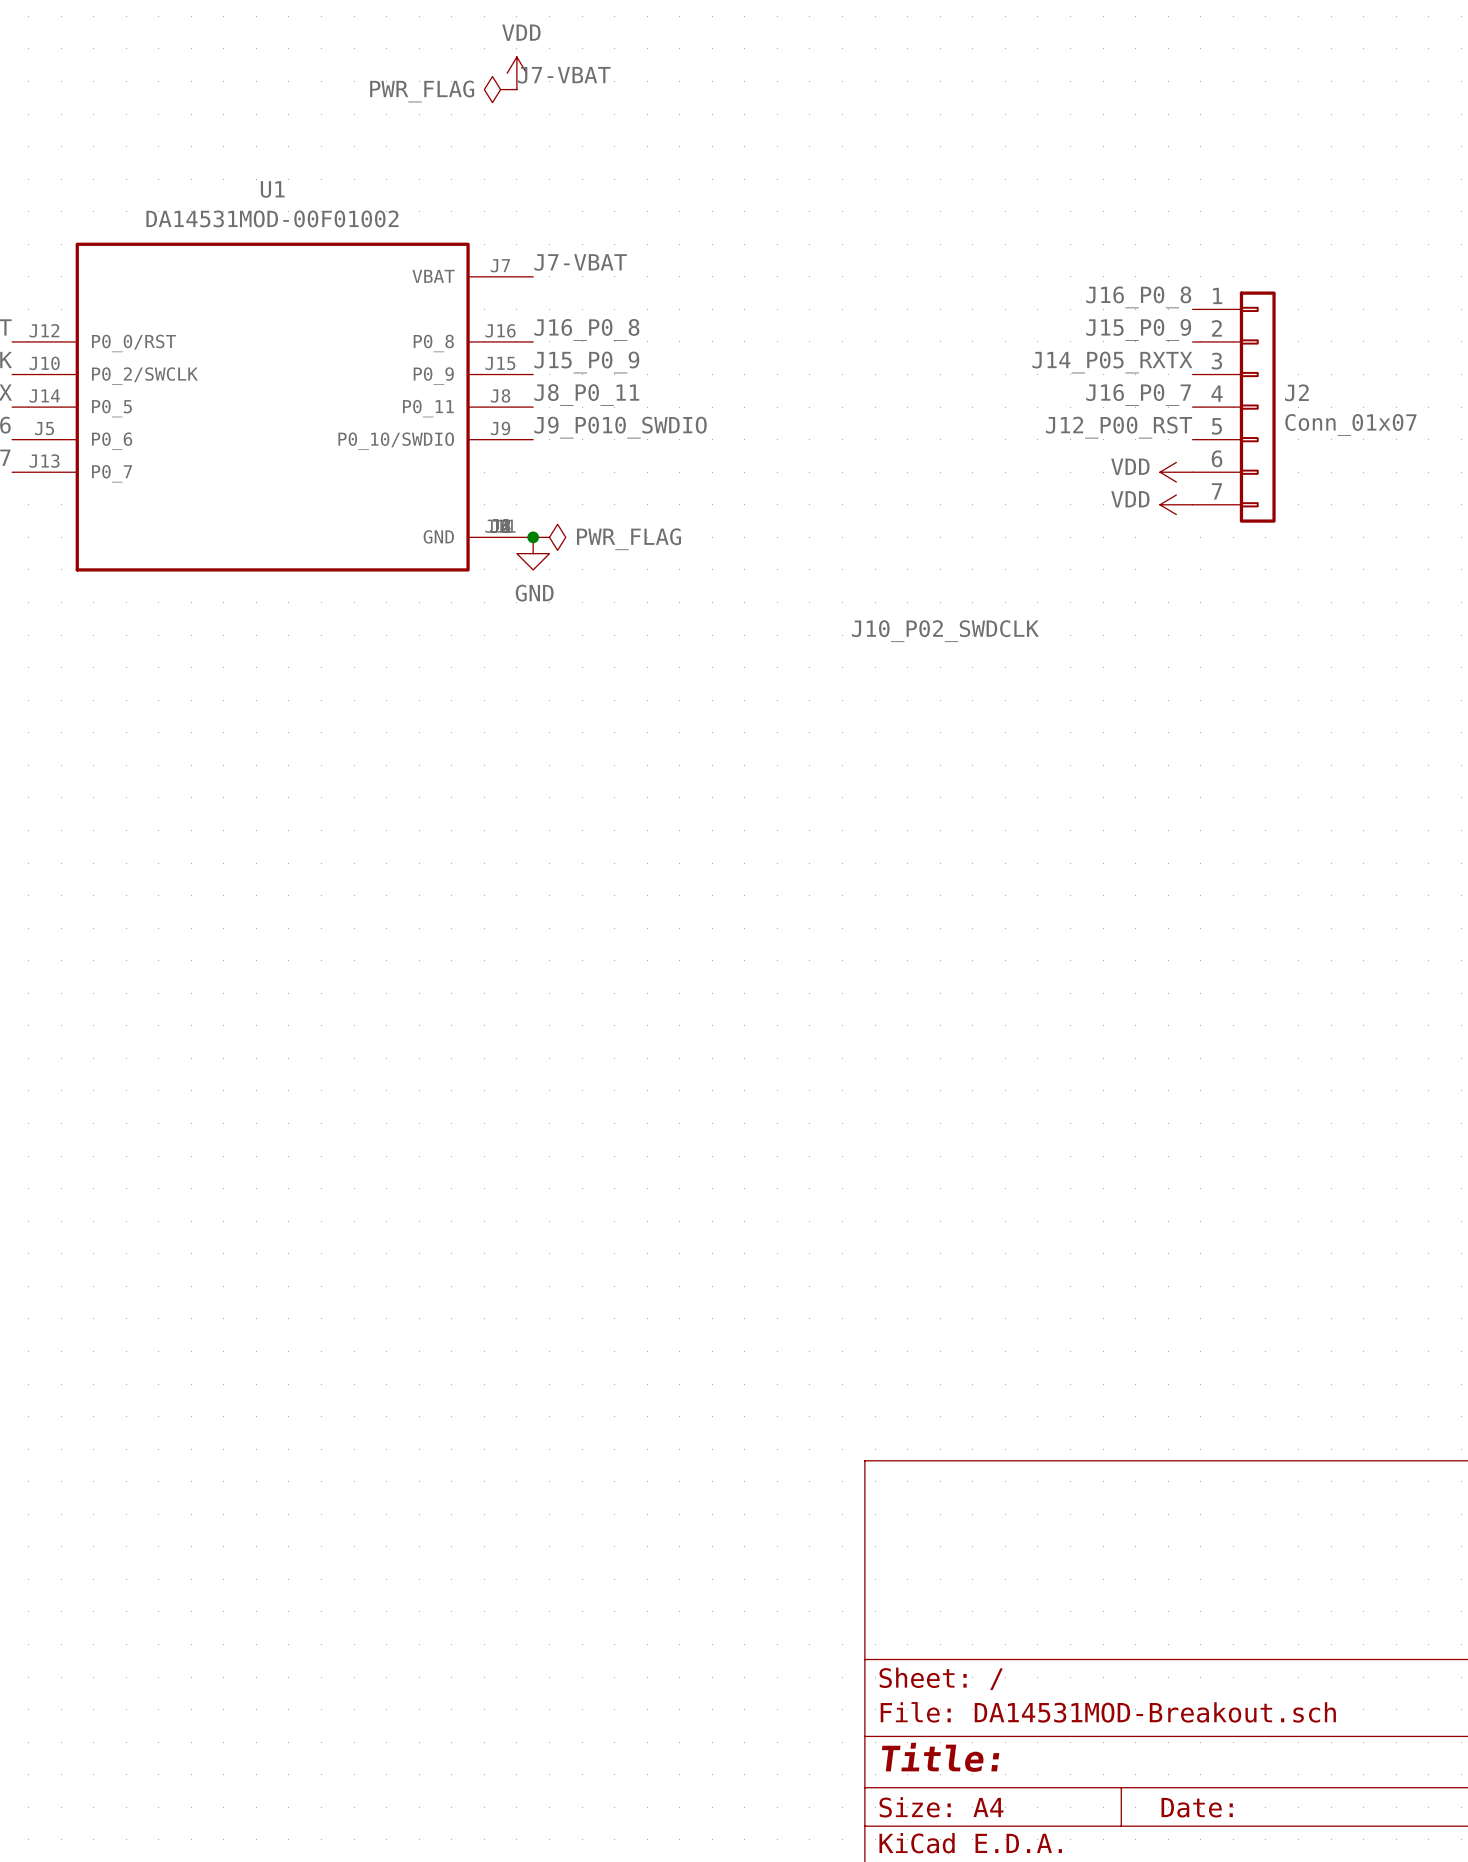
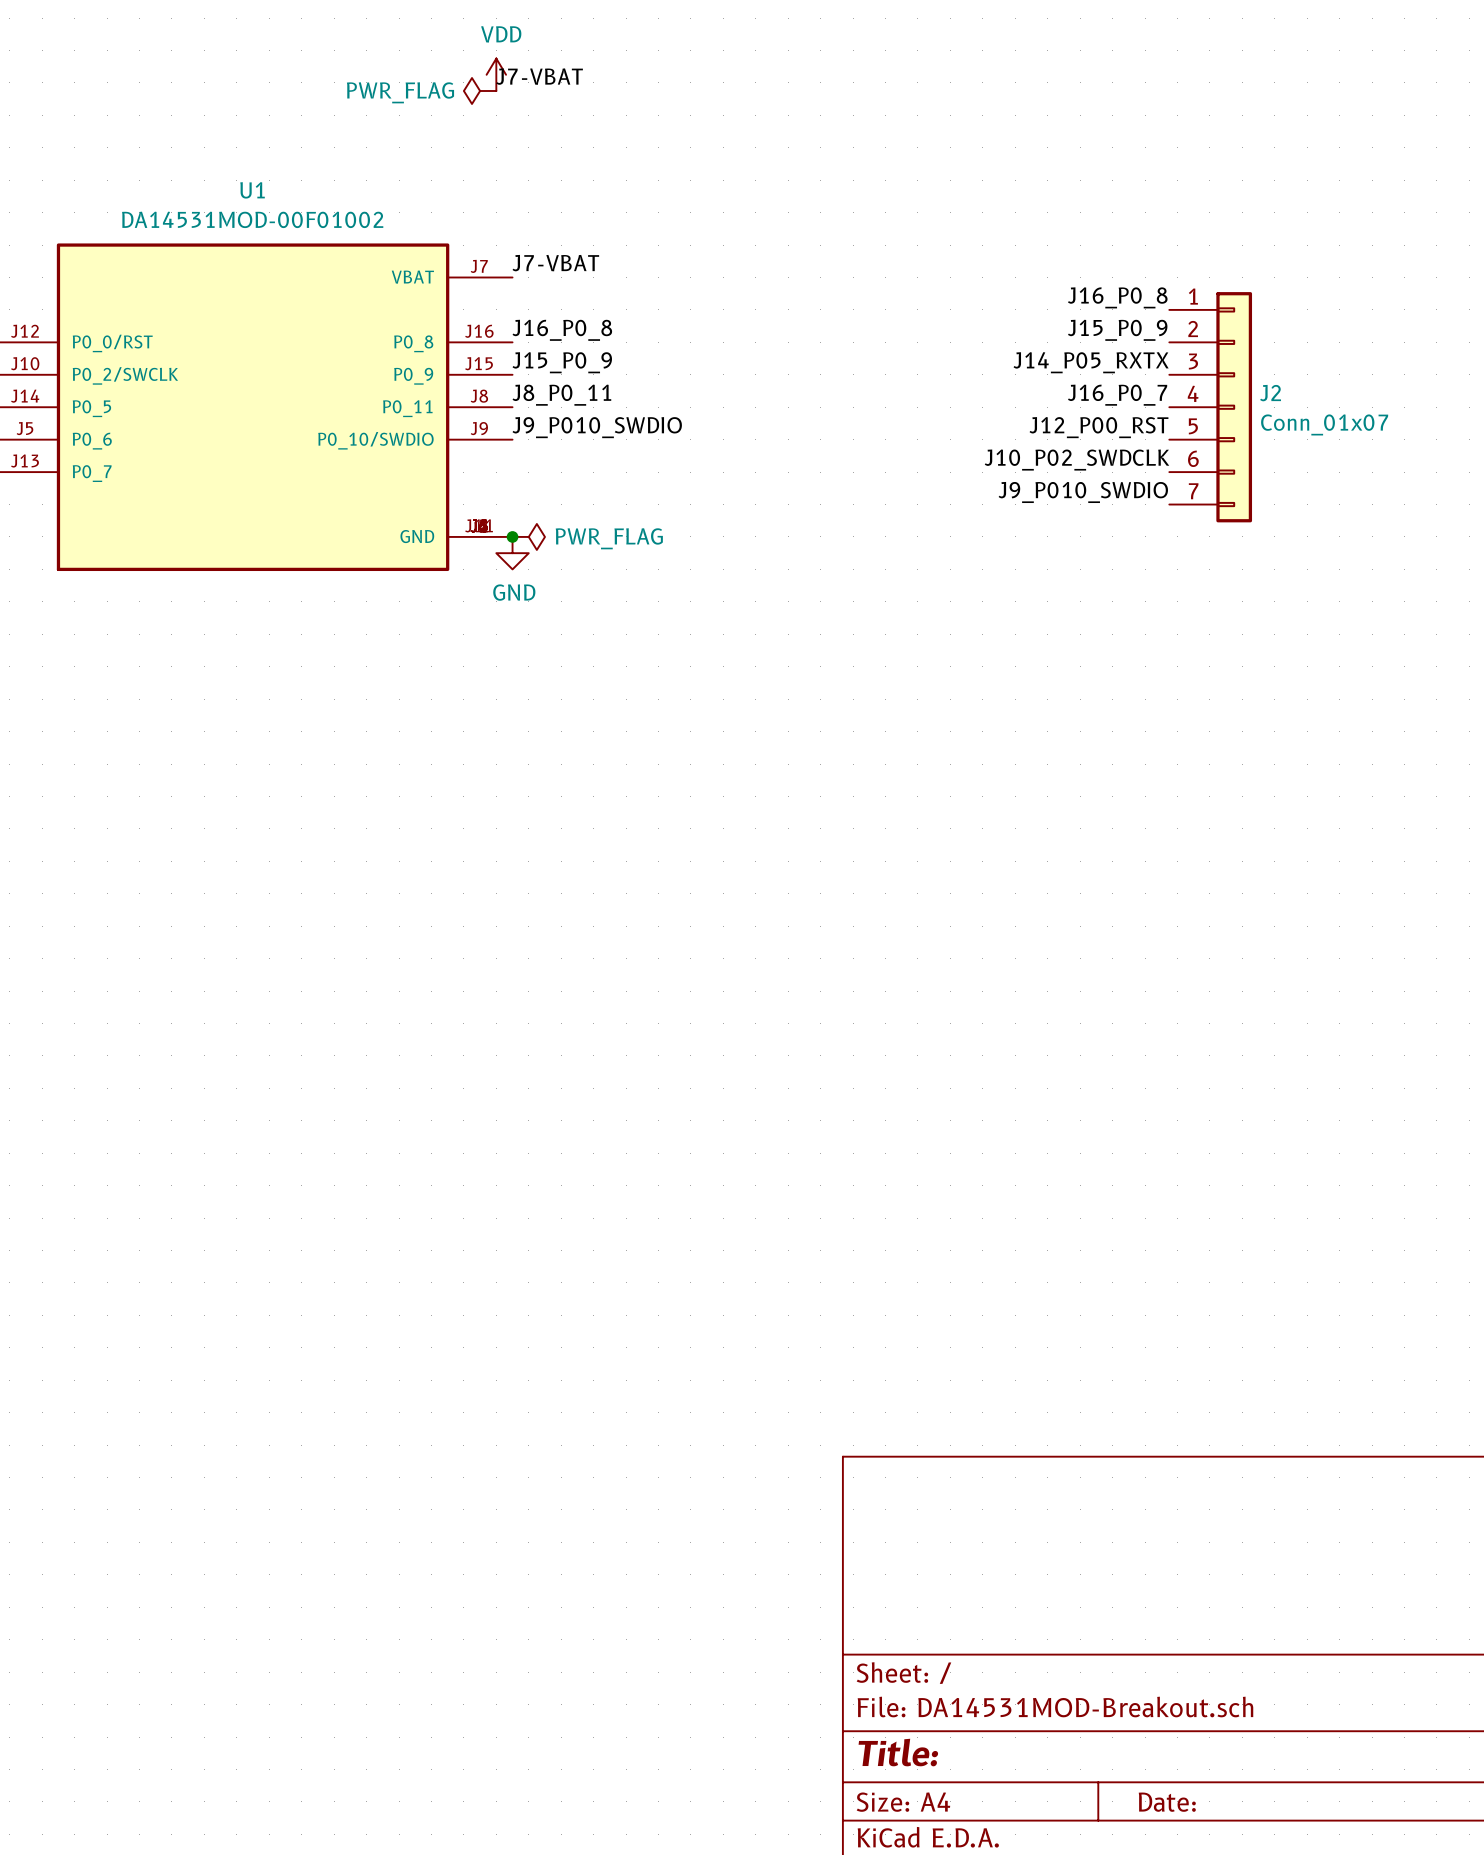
label: none -> J10_P02_SWDCLK (1076, 460)
power symbol: VDD (1176, 472) -> none
label: none -> J9_P010_SWDIO (1083, 492)
power symbol: VDD (1176, 504) -> none
label: J10_P02_SWDCLK (945, 631) -> none

